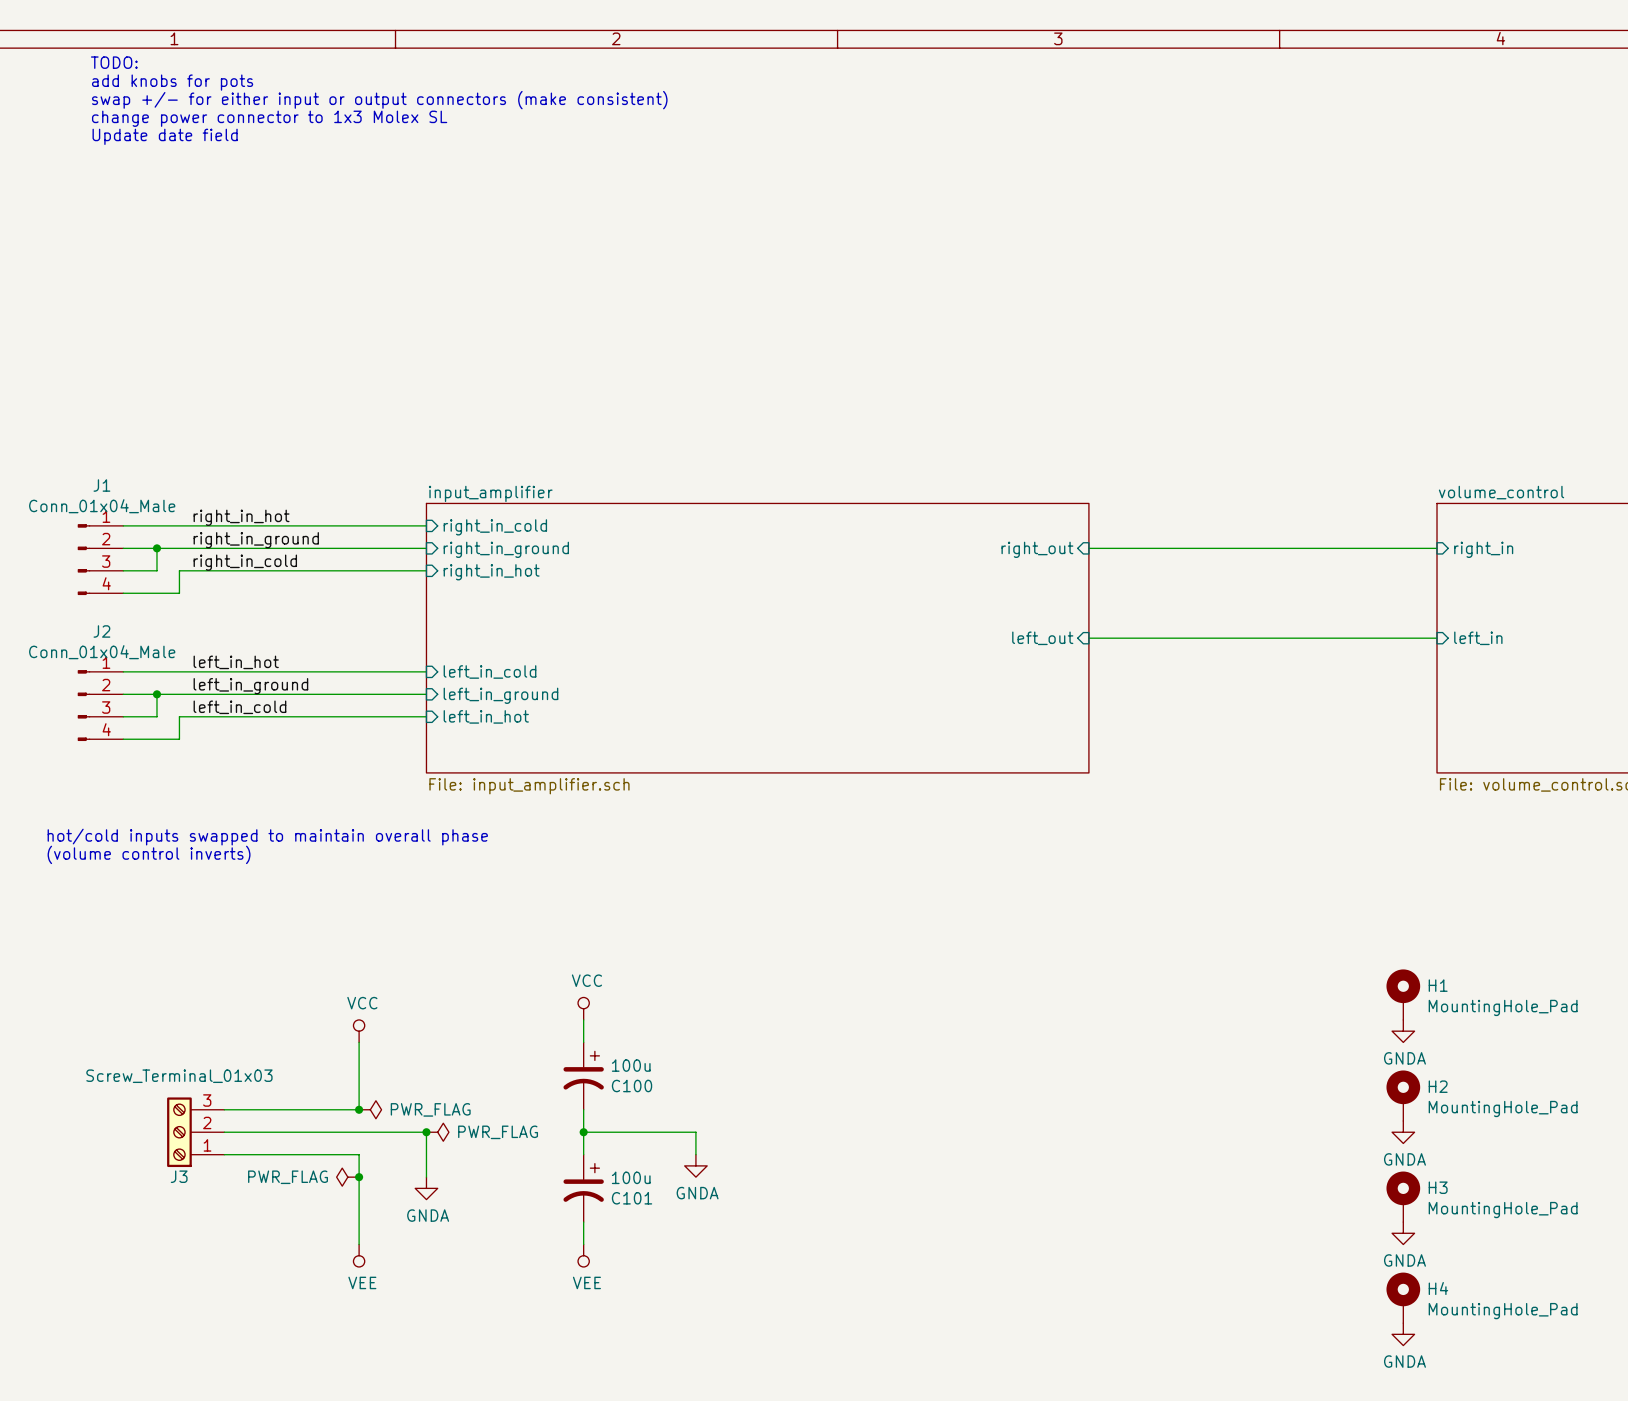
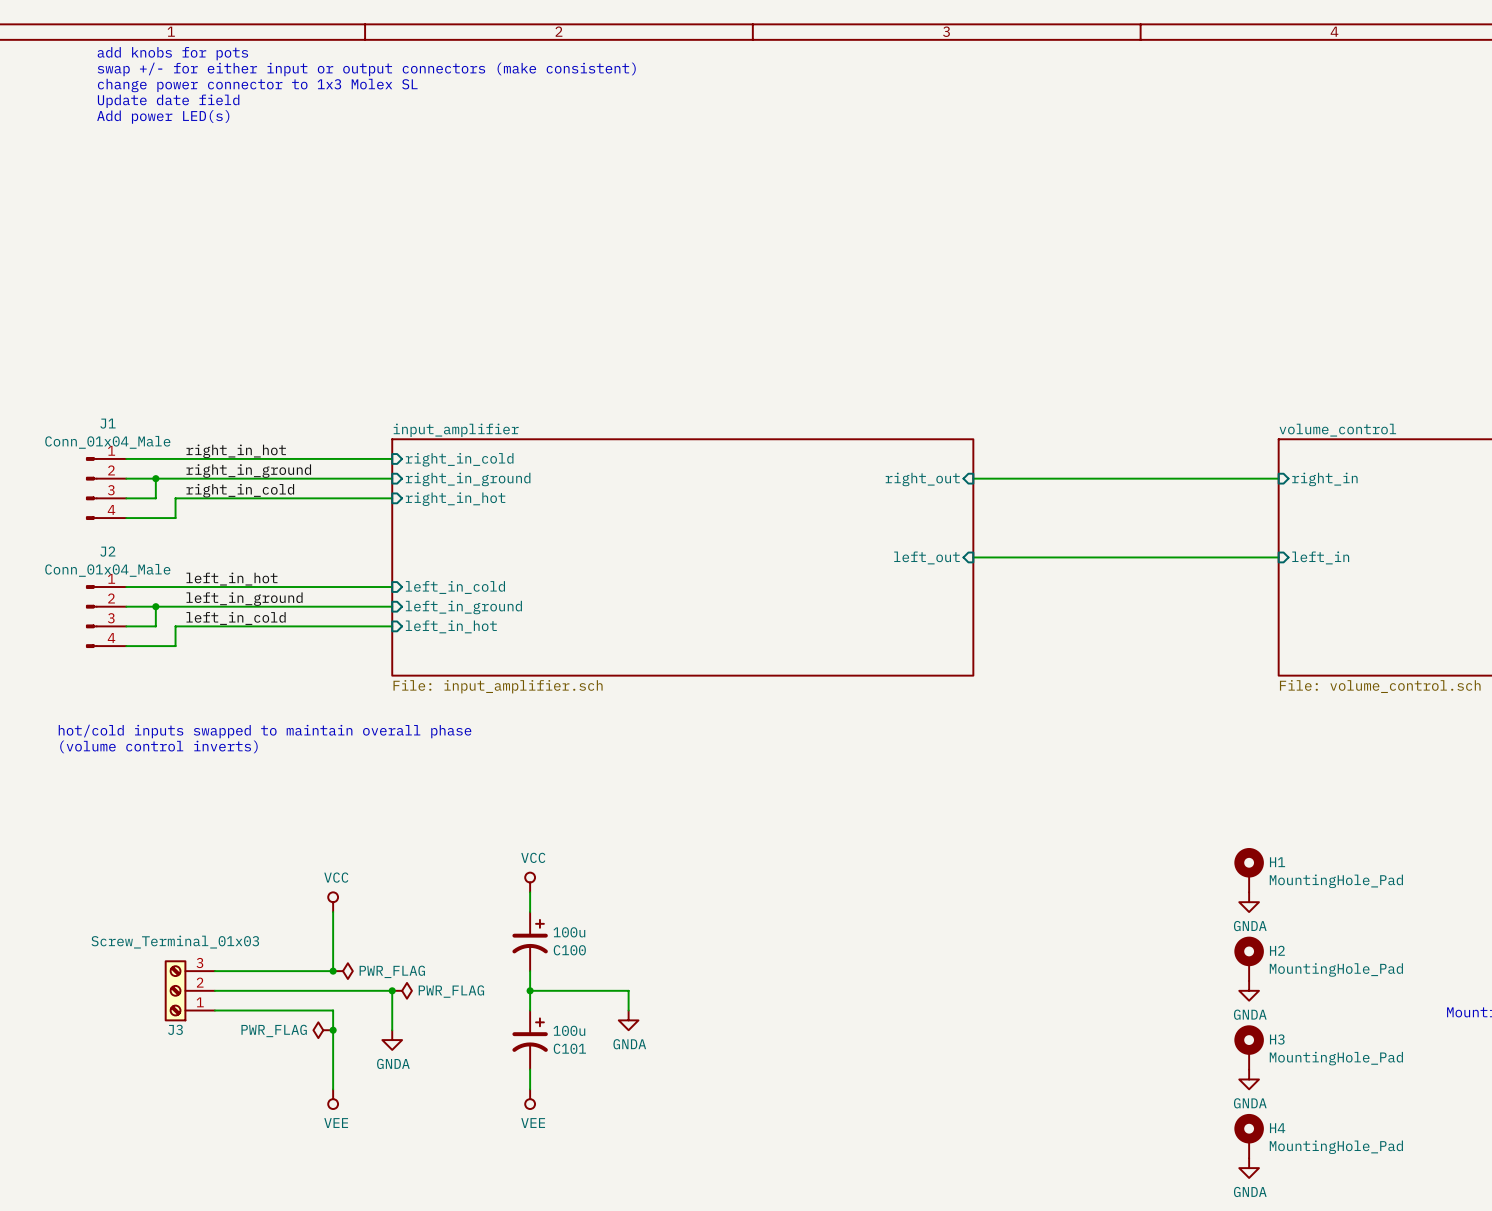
text: TODO: (114, 62) -> add knobs for pots (172, 53)
text: add knobs for pots (172, 82) -> swap +/- for either input or output connectors (make consistent) (366, 69)
text: swap +/- for either input or output connectors (make consistent) (379, 100) -> change power connector to 1x3 Molex SL (257, 85)
text: change power connector to 1x3 Molex SL (269, 118) -> Update date field (168, 101)
text: Update date field (165, 136) -> Add power LED(s) (163, 116)

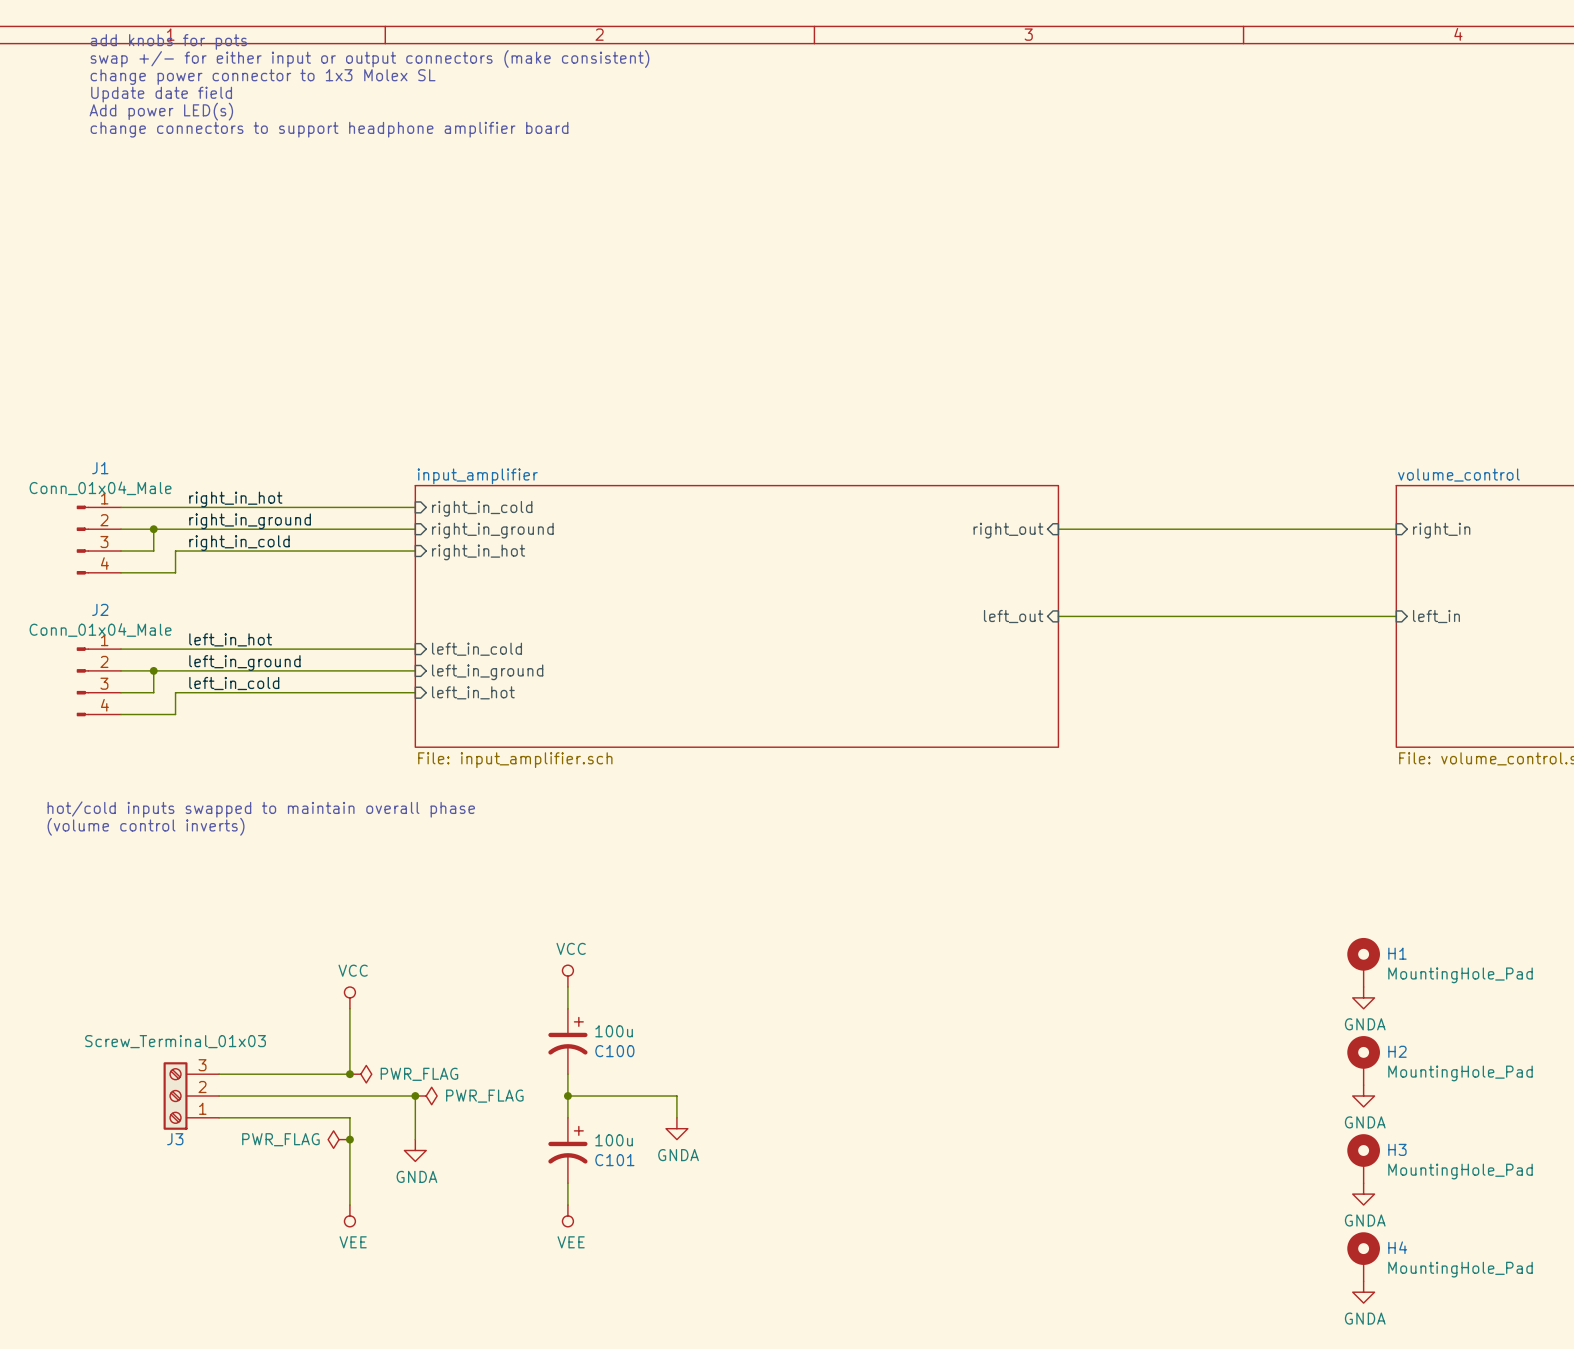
text: none -> add knobs for pots (168, 41)
text: add knobs for pots (172, 53) -> swap +/- for either input or output connectors (make consistent) (370, 58)
text: swap +/- for either input or output connectors (make consistent) (366, 69) -> change power connector to 1x3 Molex SL (263, 77)
text: change power connector to 1x3 Molex SL (257, 85) -> Update date field (161, 94)
text: Update date field (168, 101) -> Add power LED(s) (161, 111)
text: Add power LED(s) (163, 116) -> change connectors to support headphone amplifier board (329, 129)

